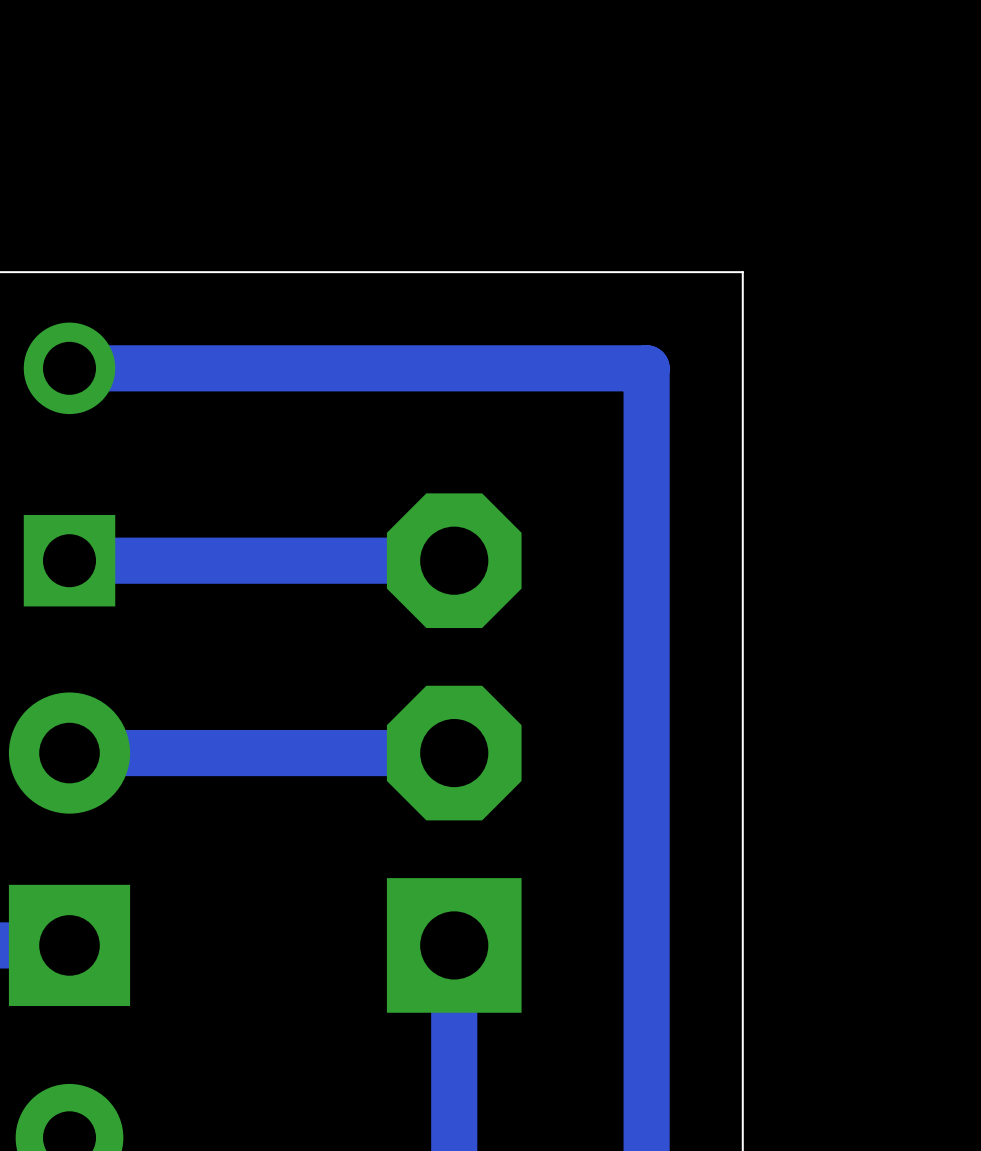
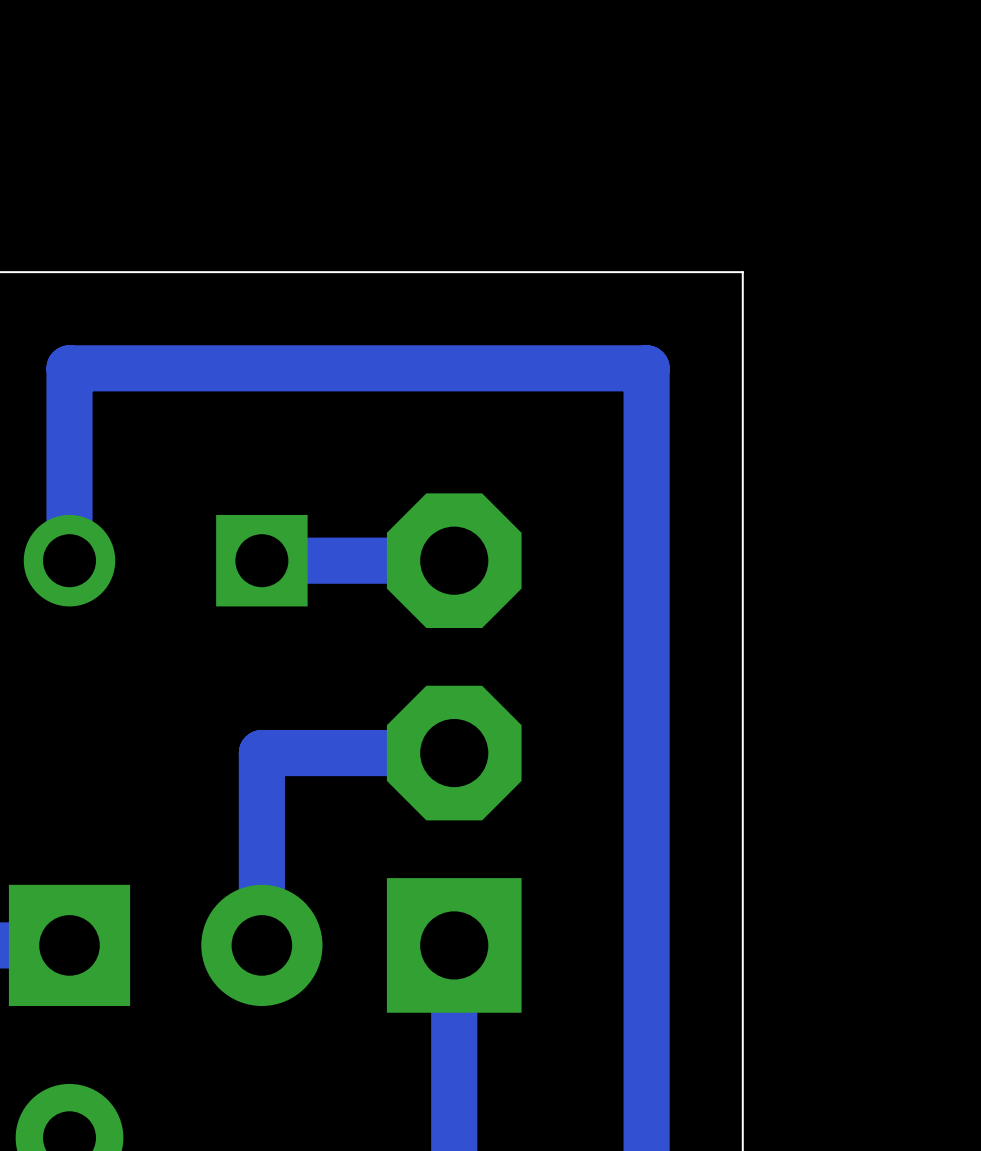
part rotation: 0° (69, 464) -> 90° counterclockwise (165, 560)
bottom track: (261, 560) (69, 560) -> (69, 368) (69, 560)
bottom track: (261, 753) (69, 753) -> (261, 753) (261, 945)
part rotation: 0° (69, 849) -> 90° clockwise (165, 945)

